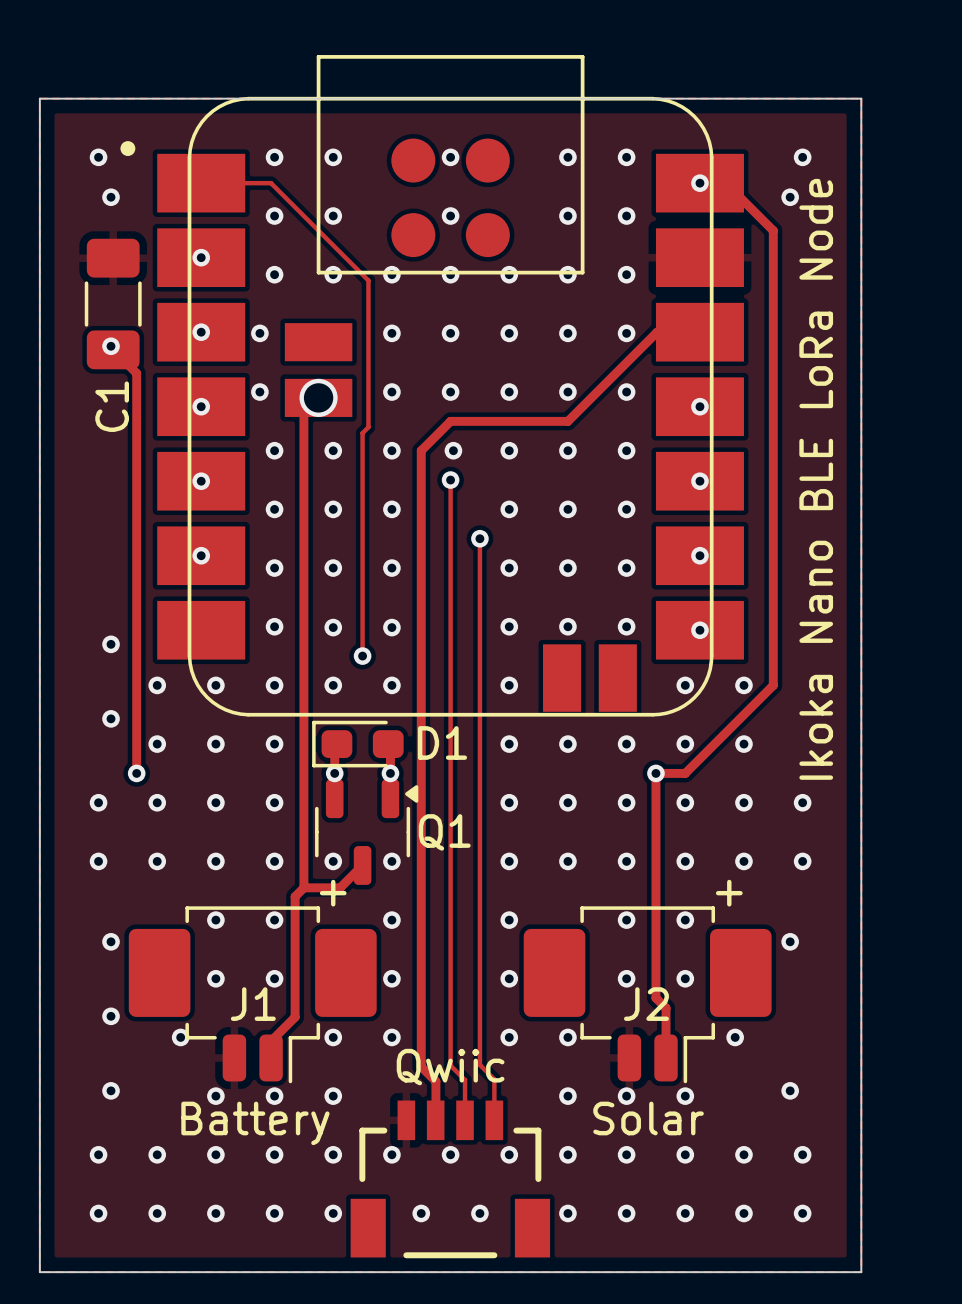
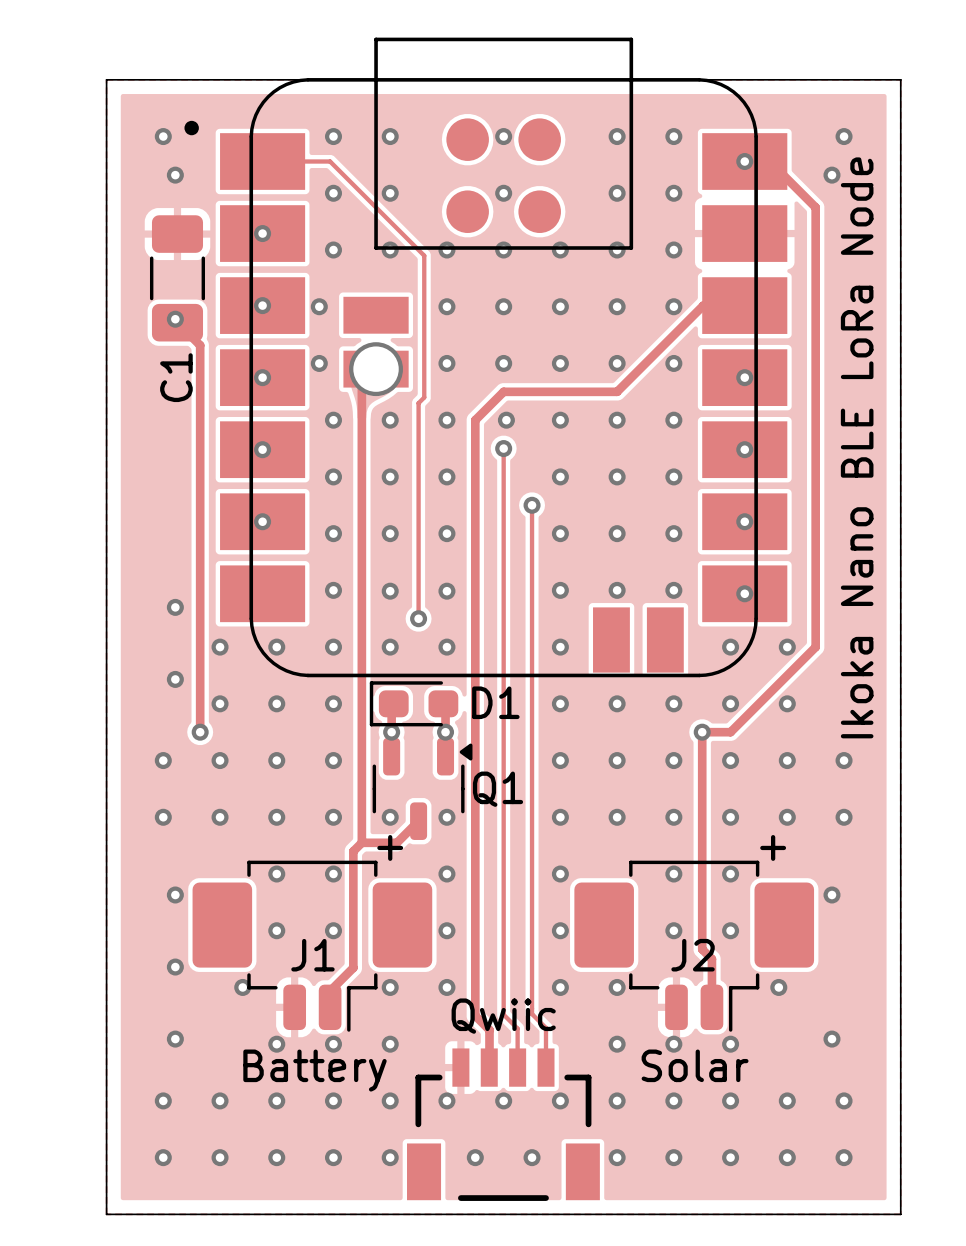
via size: [299, 378, 338, 417] -> [349, 342, 403, 397]

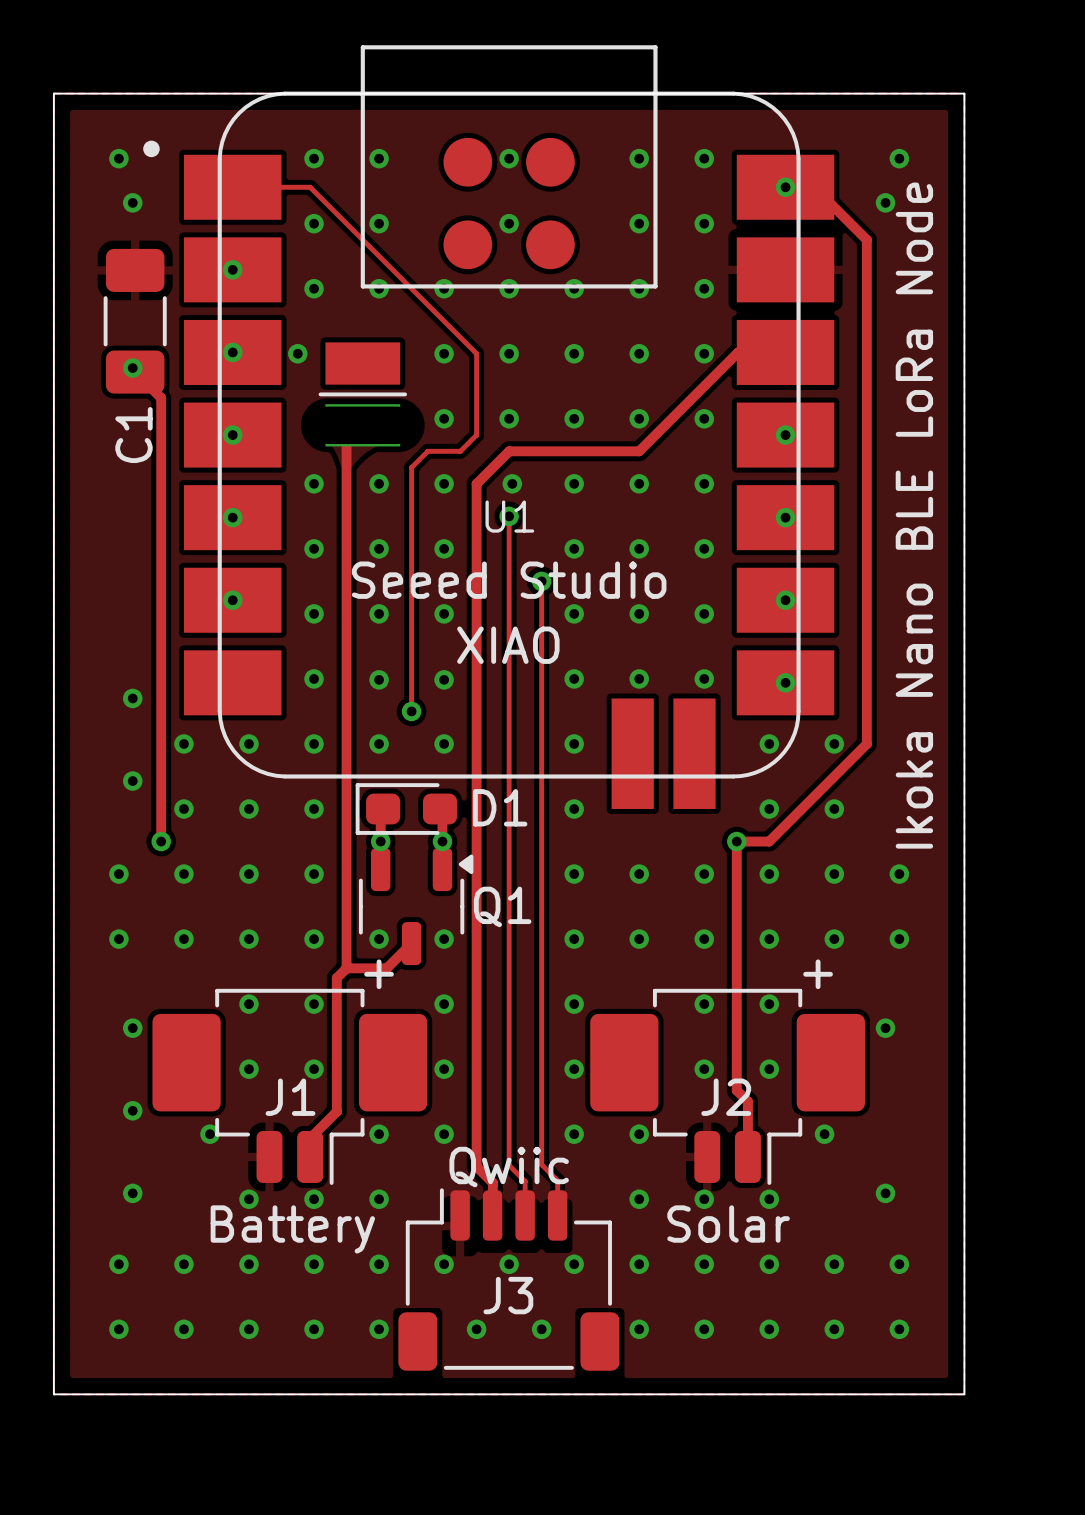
track: (424, 255) (424, 397) (418, 403) (418, 406) -> (418, 295) (476, 353) (476, 435) (460, 451) (427, 451) (411, 467)
part: (485, 357) -> none
via: (319, 363) -> none
via: (376, 369) -> none
U1: none -> (488, 427)
via: (617, 703) -> none
via: (673, 703) -> none
J3: none -> (508, 1279)
part: (503, 1124) -> none

